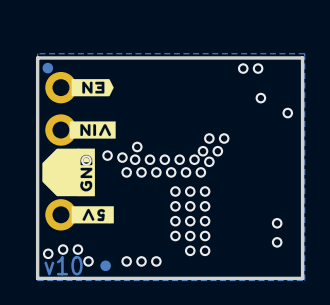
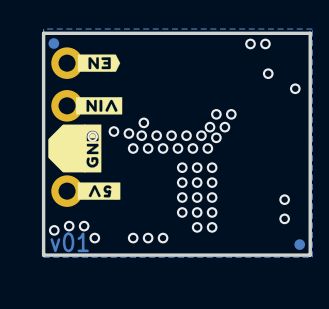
text: v10 (63, 265) -> v01 (69, 242)
part position: (105, 265) -> (299, 244)

